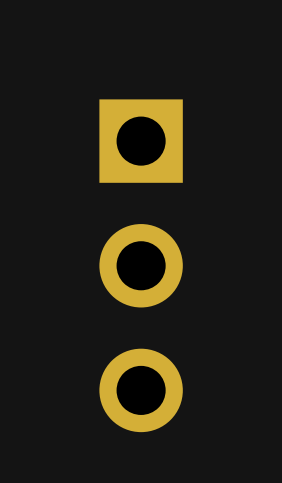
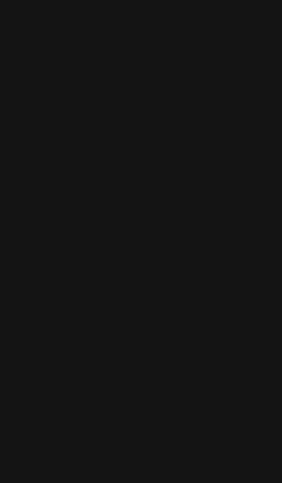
part: (141, 265) -> none

